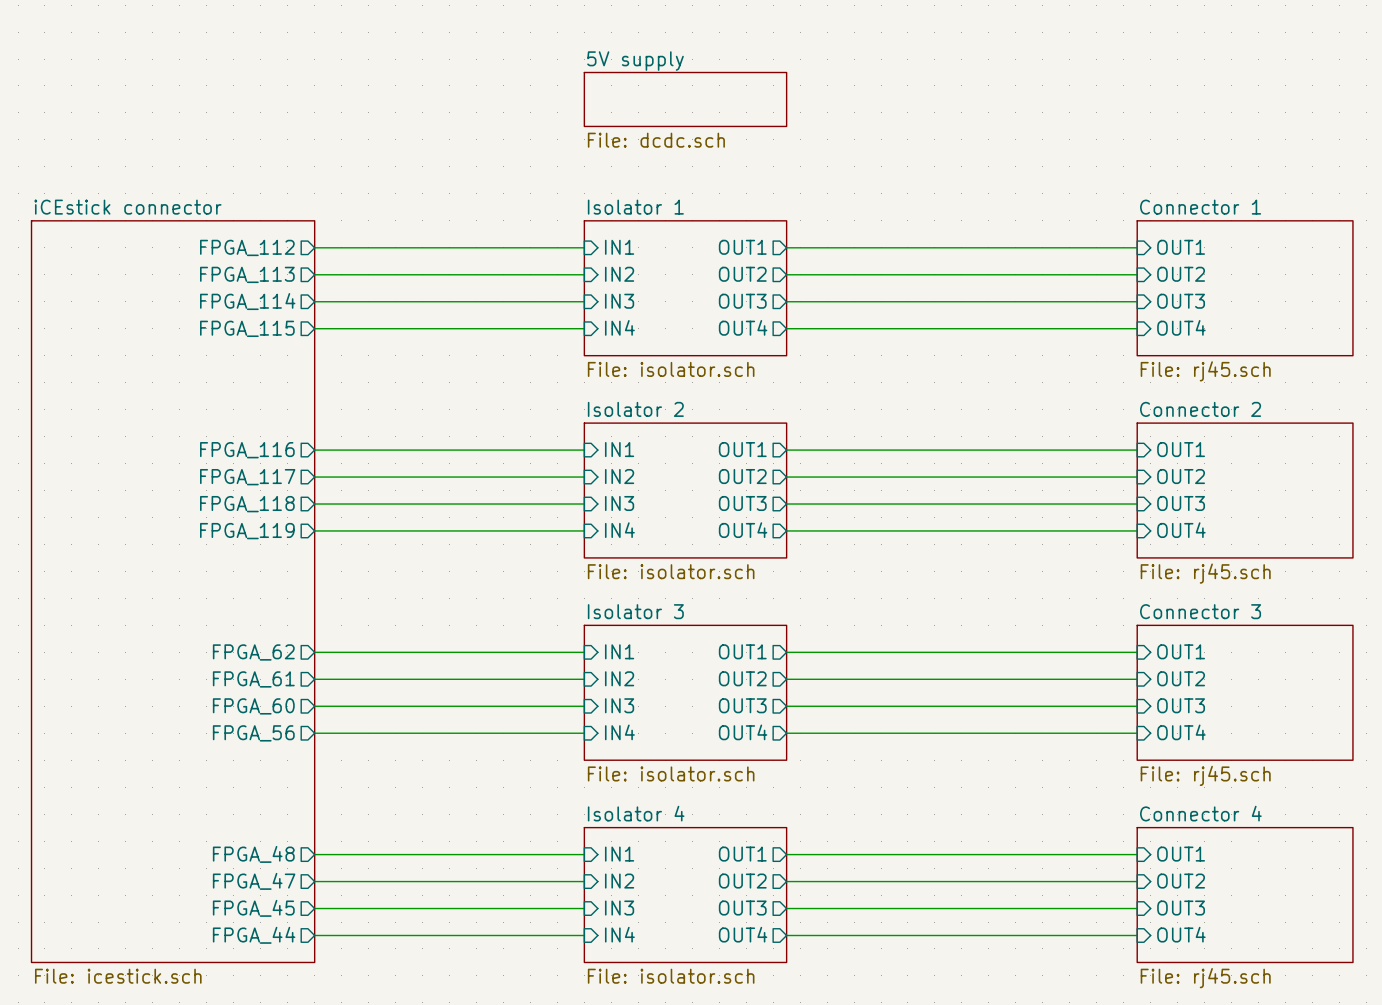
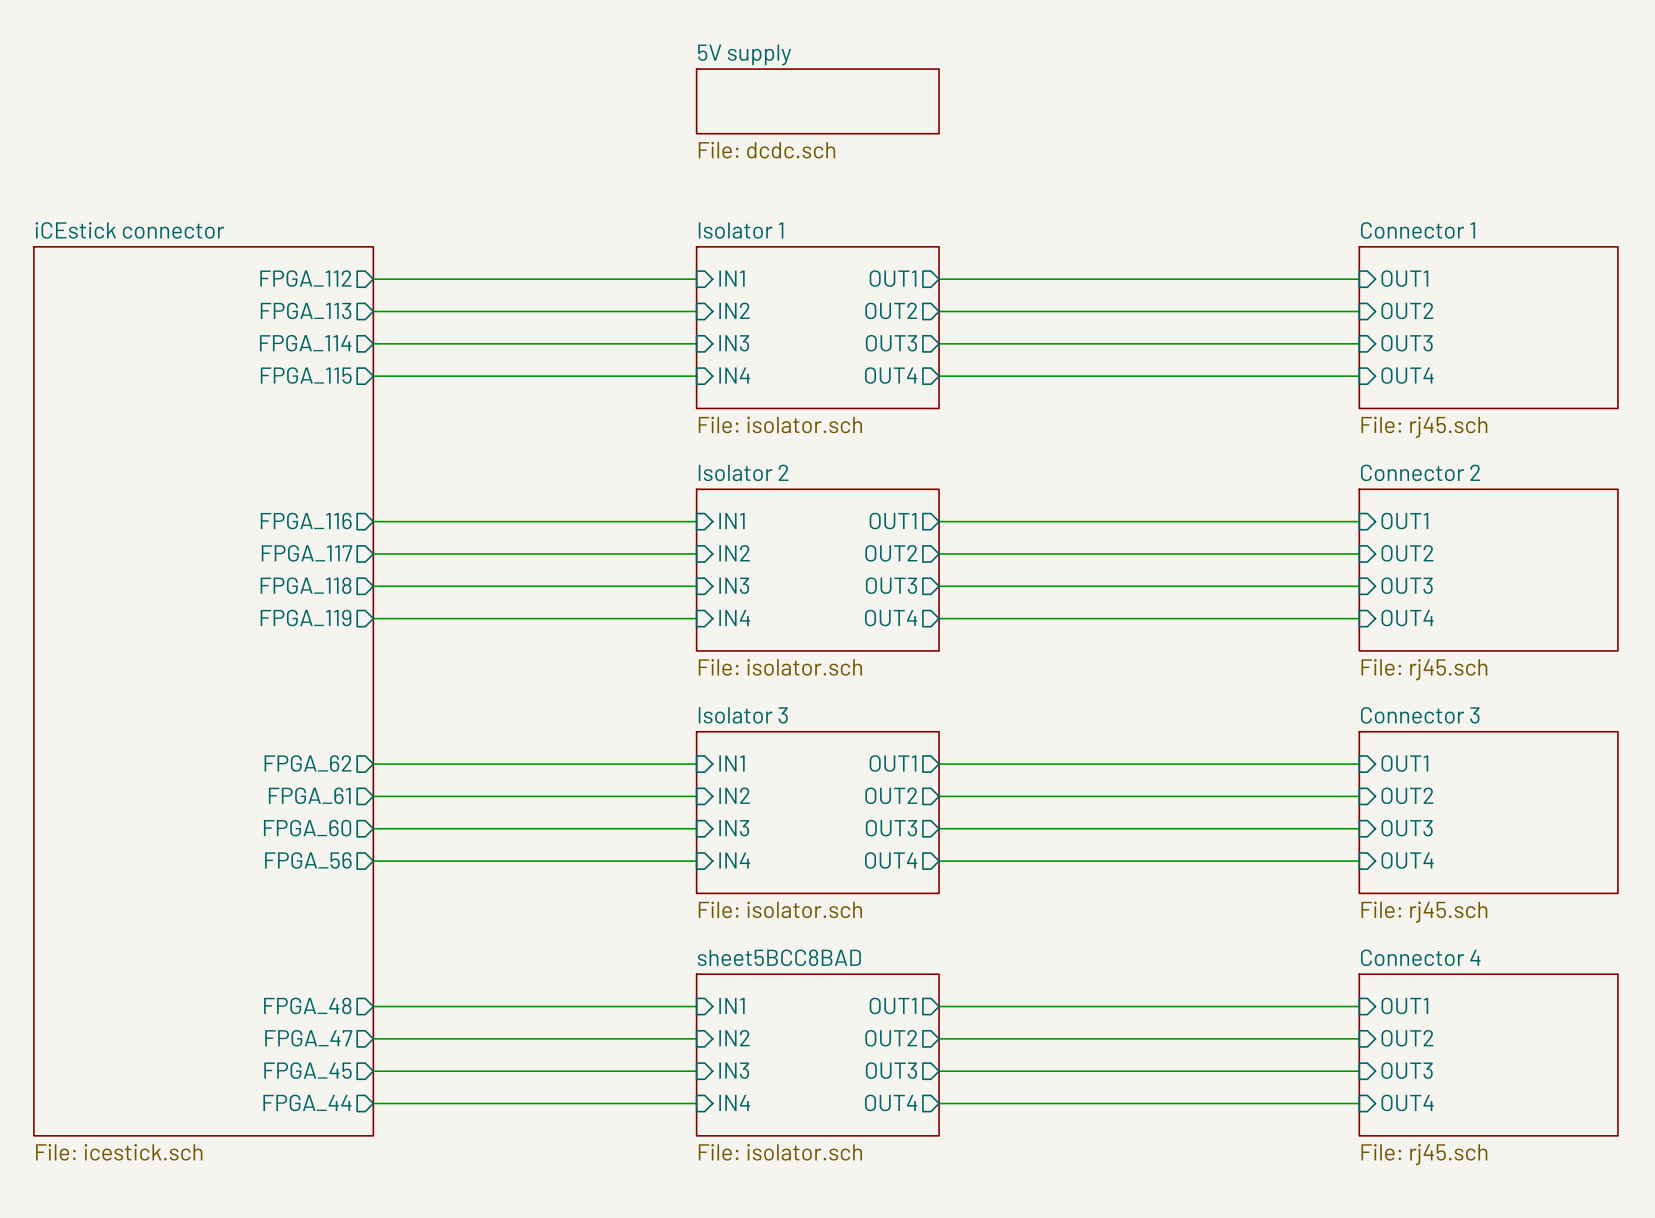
sheet Isolator 4 name: Isolator 4 (636, 813) -> sheet5BCC8BAD (779, 957)

